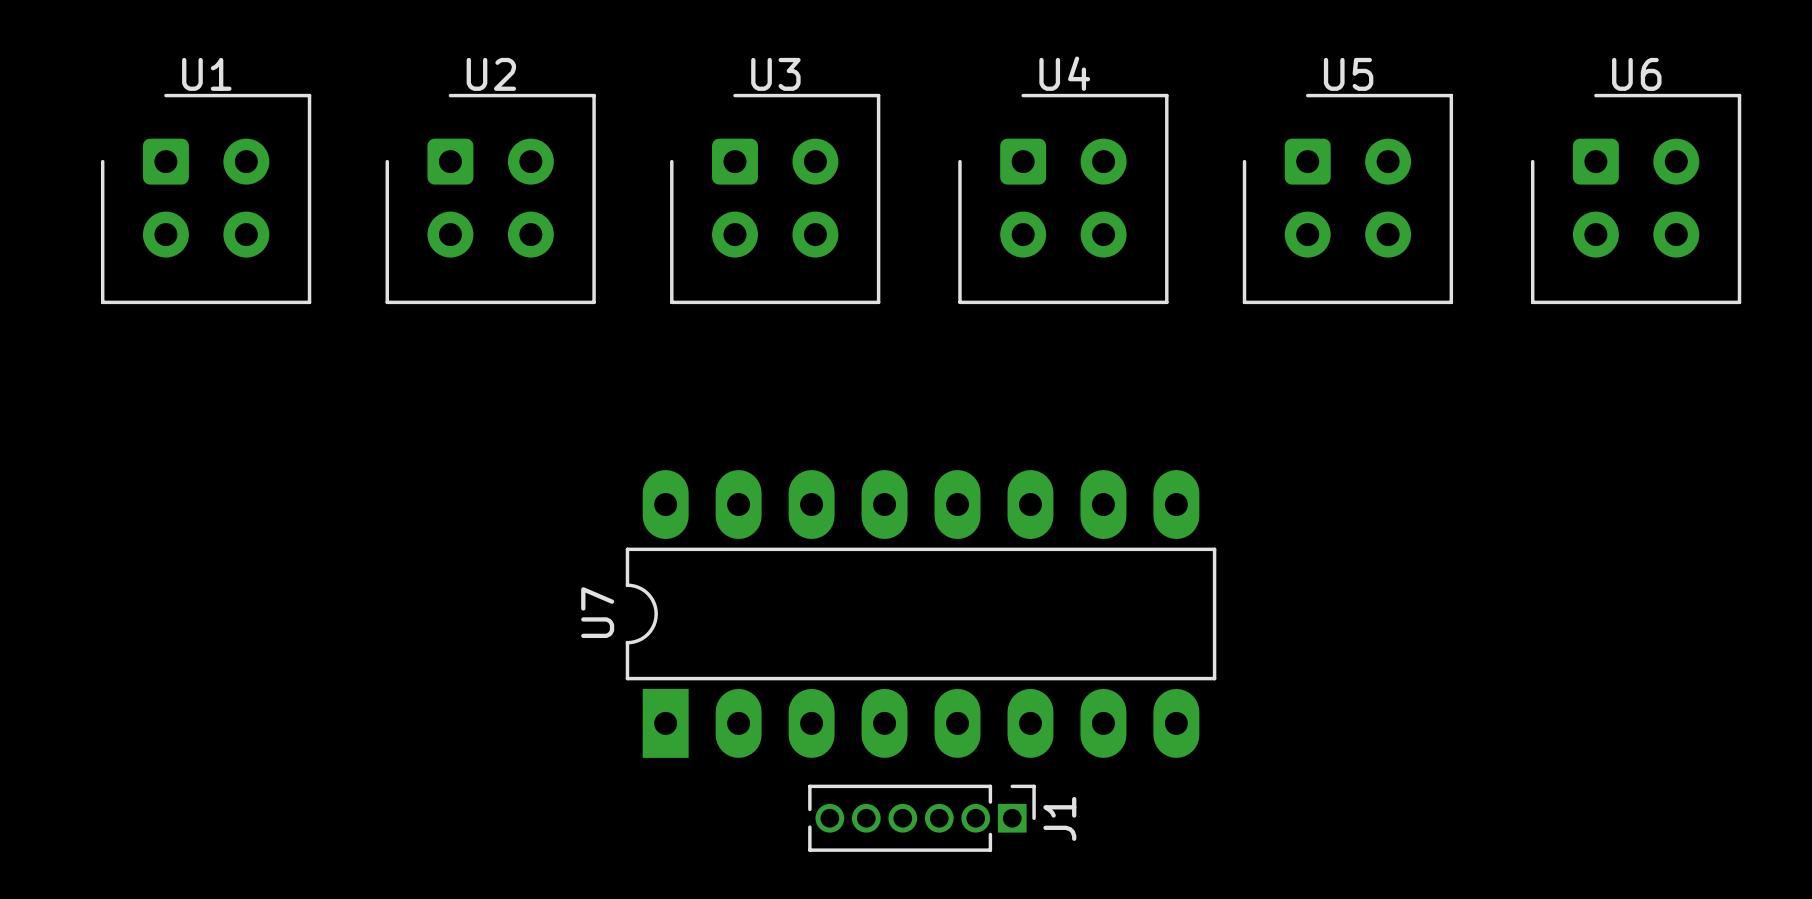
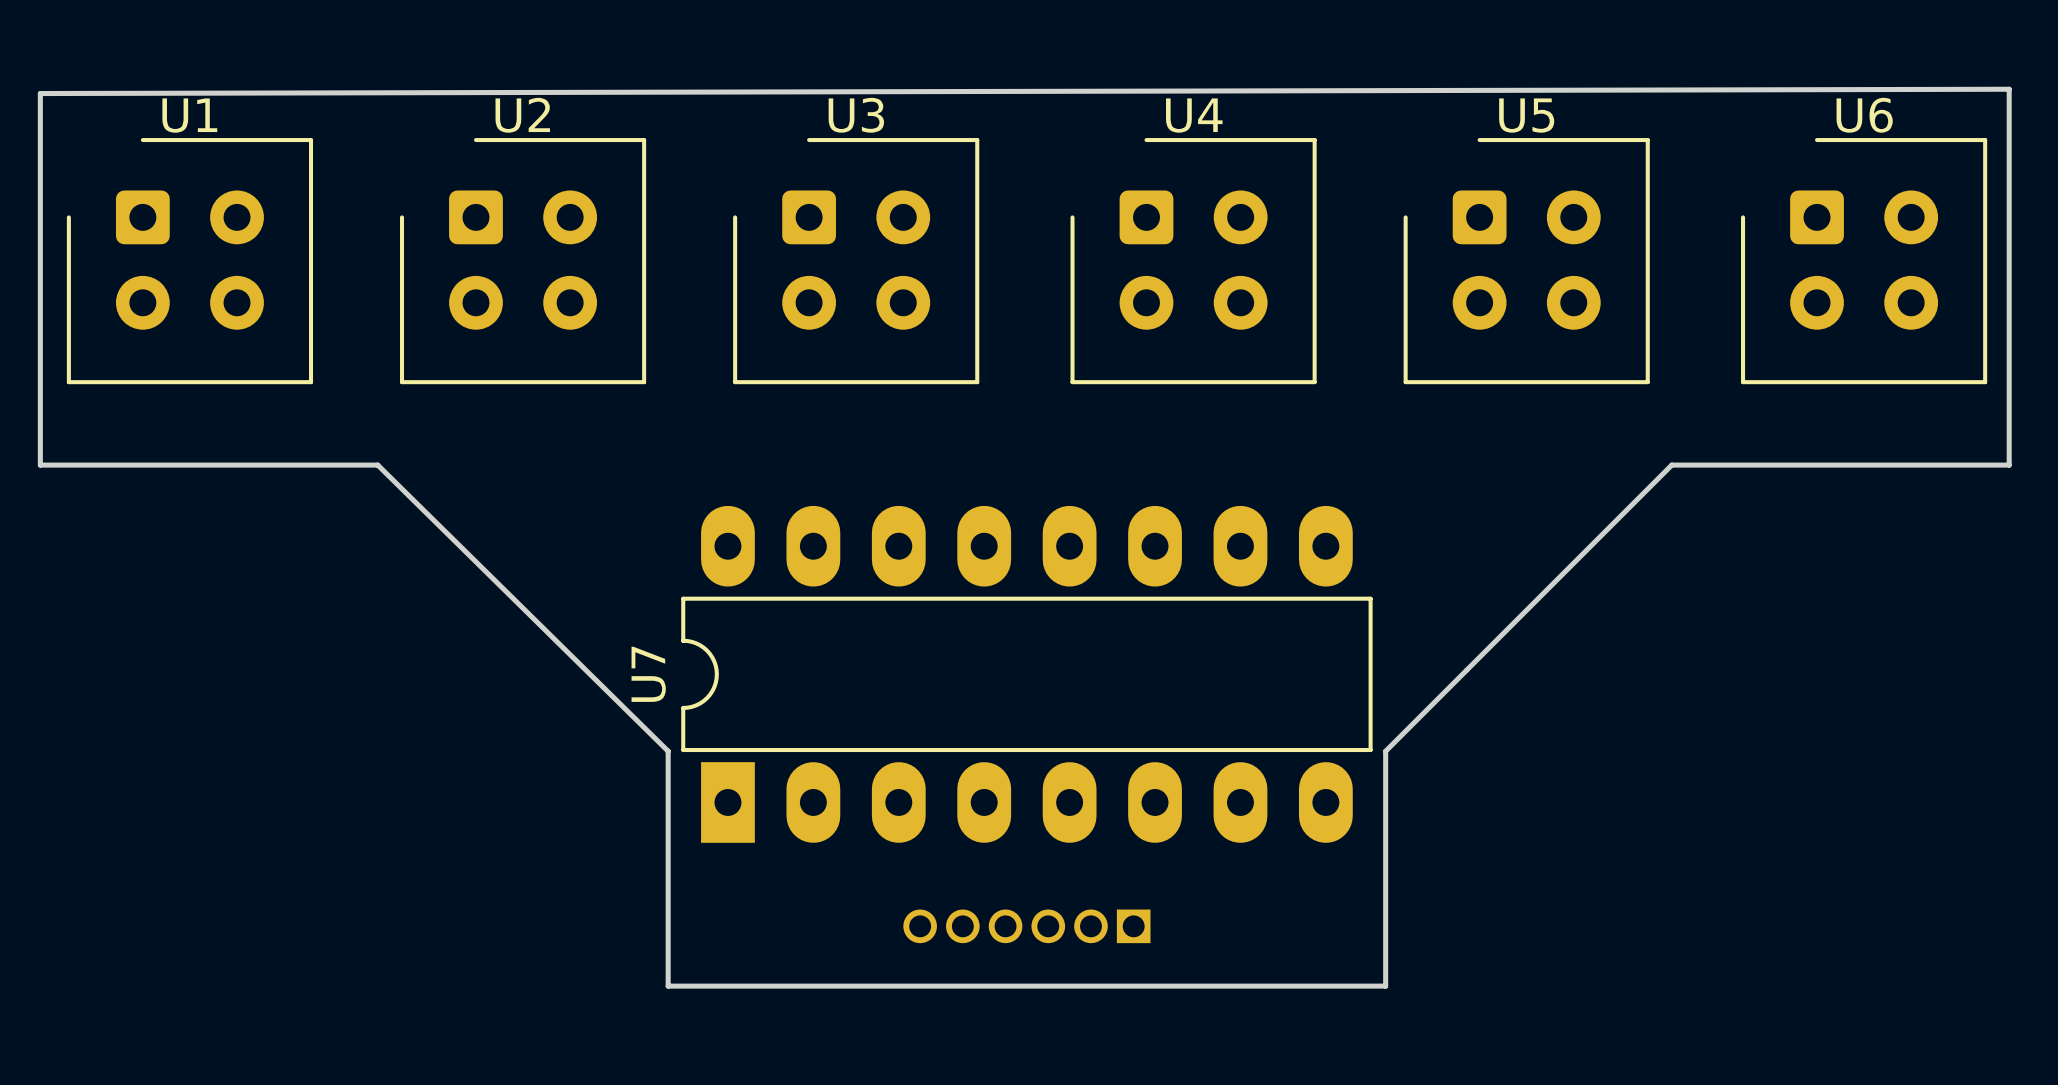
board edge: none -> (2009, 89) (2009, 465) (1671, 465) (1385, 751) (1385, 986) (668, 986) (668, 751) (377, 465) (40, 465) (40, 93) (2009, 89)
U7 position: (921, 613) -> (1026, 674)
J1 side: top (921, 818) -> bottom (1026, 926)

